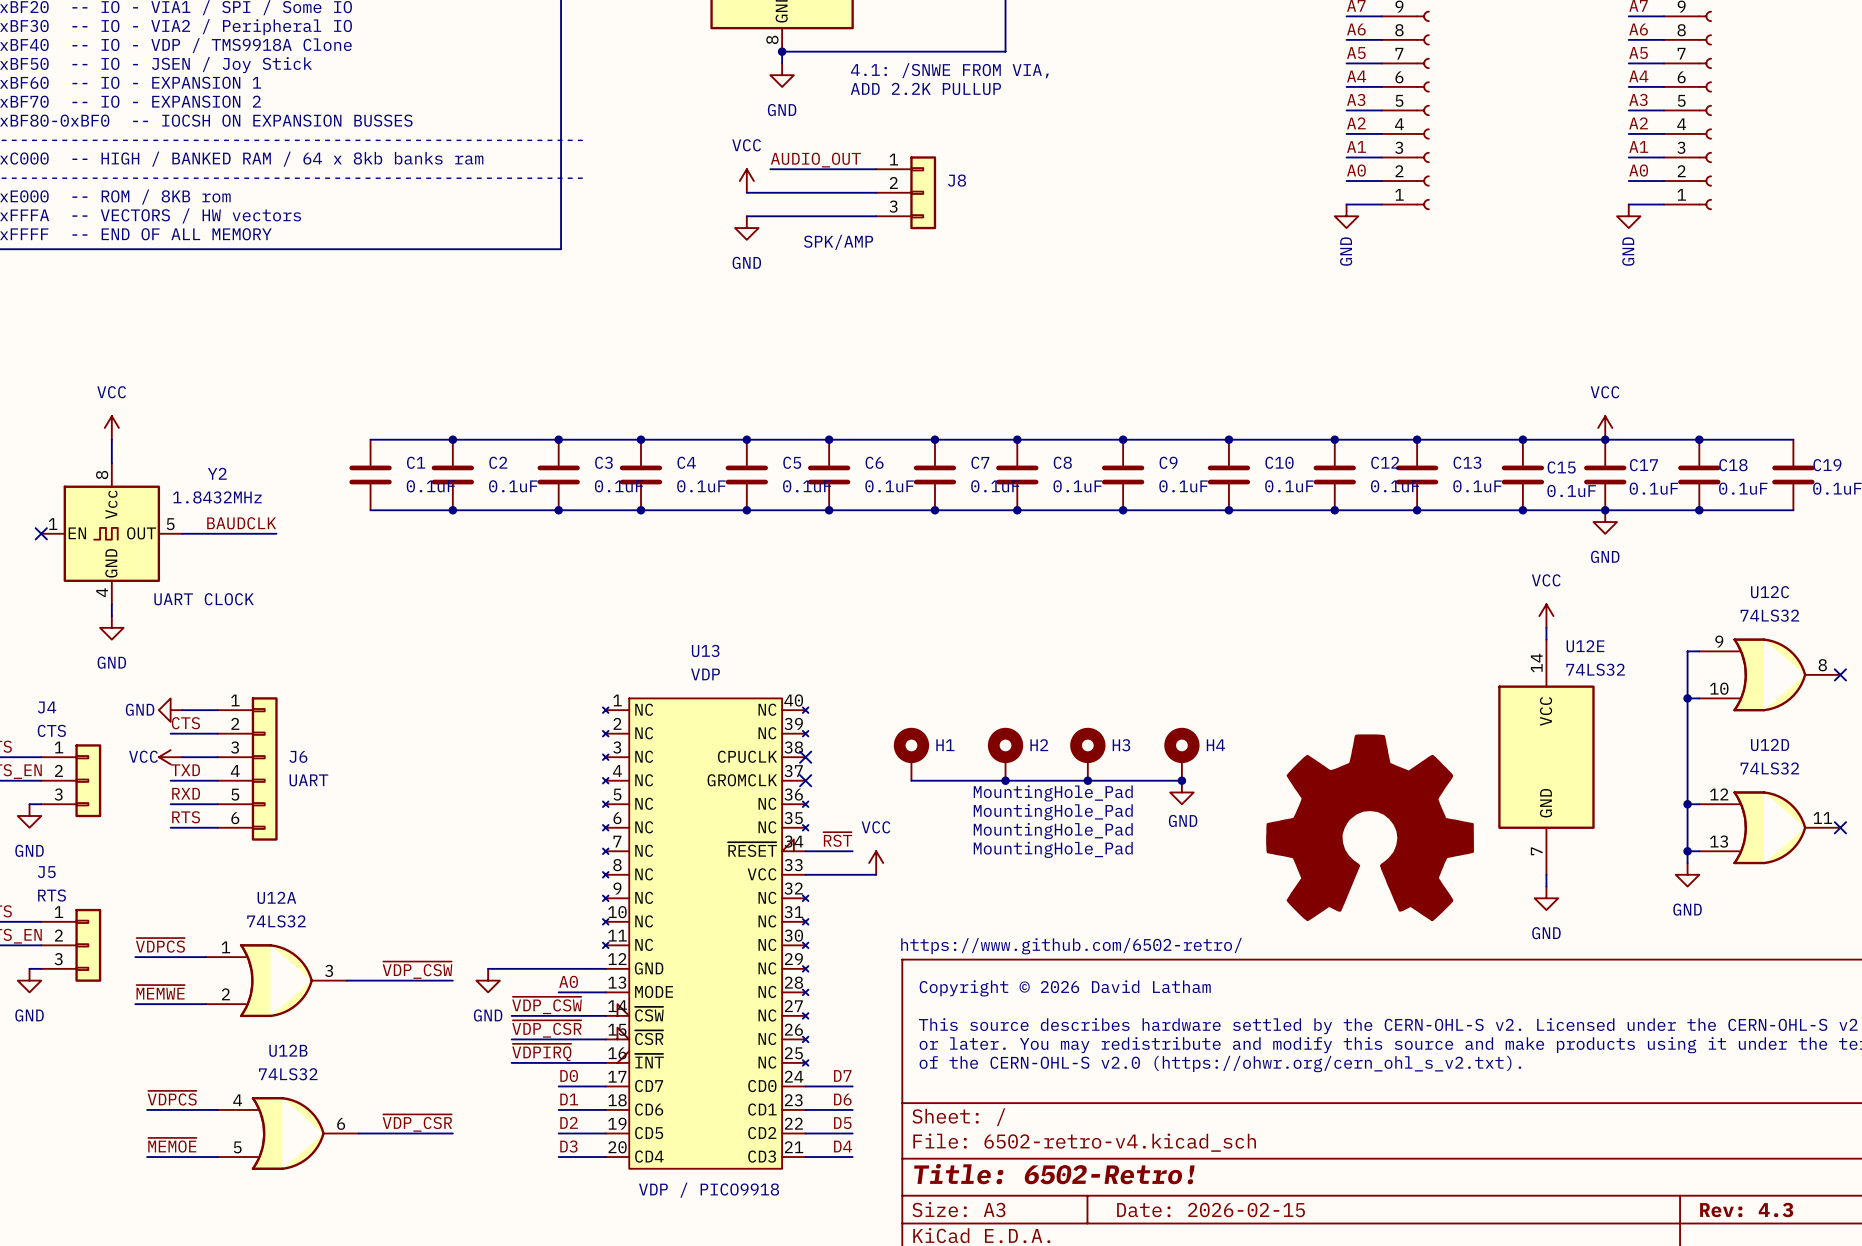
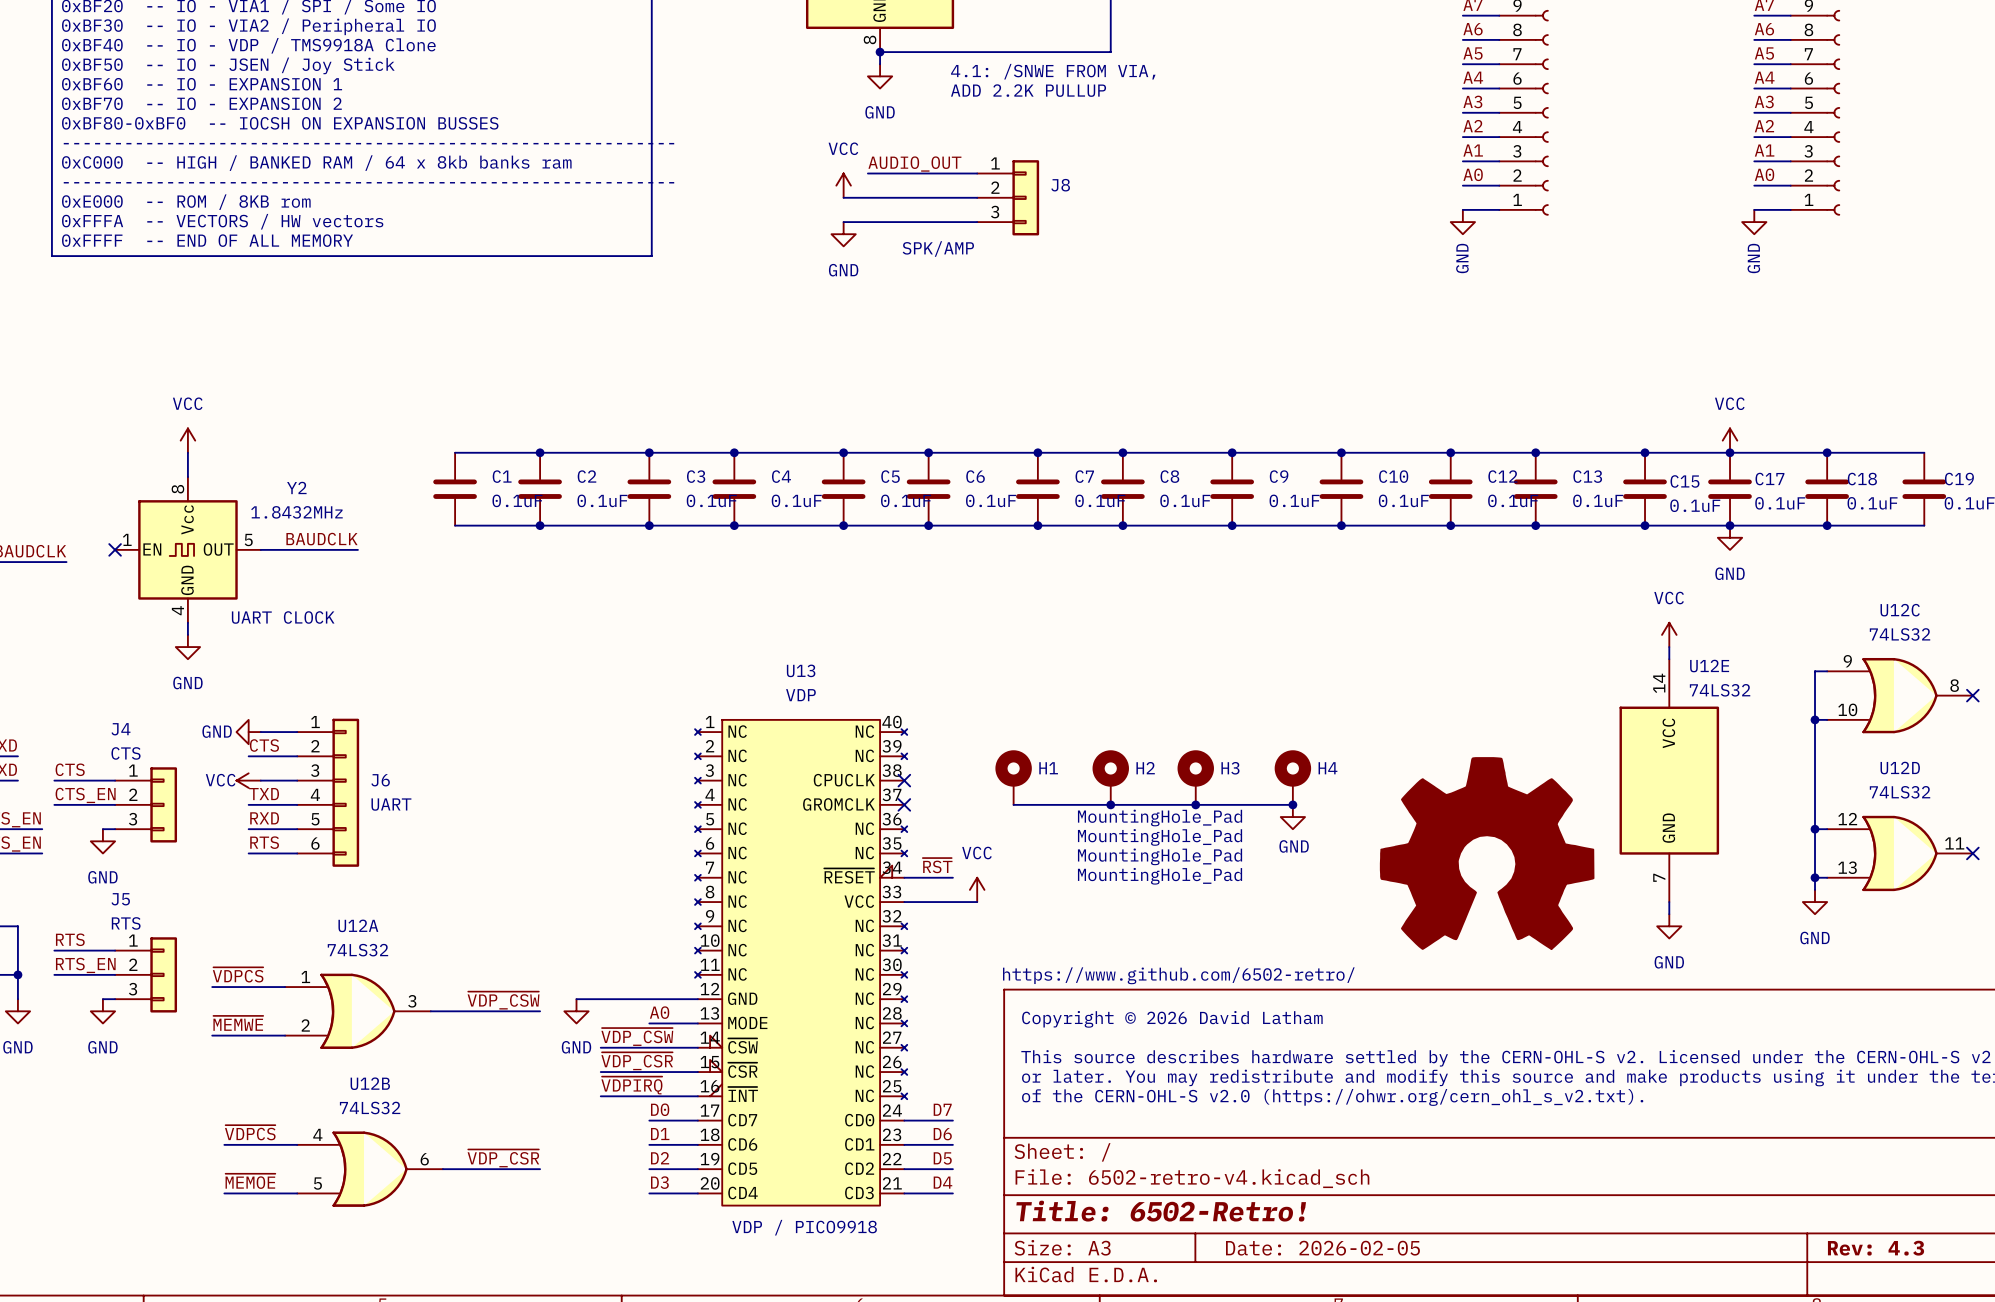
title block: Date: 2026-02-15 (1211, 1210) -> Date: 2026-02-05 (1322, 1248)

